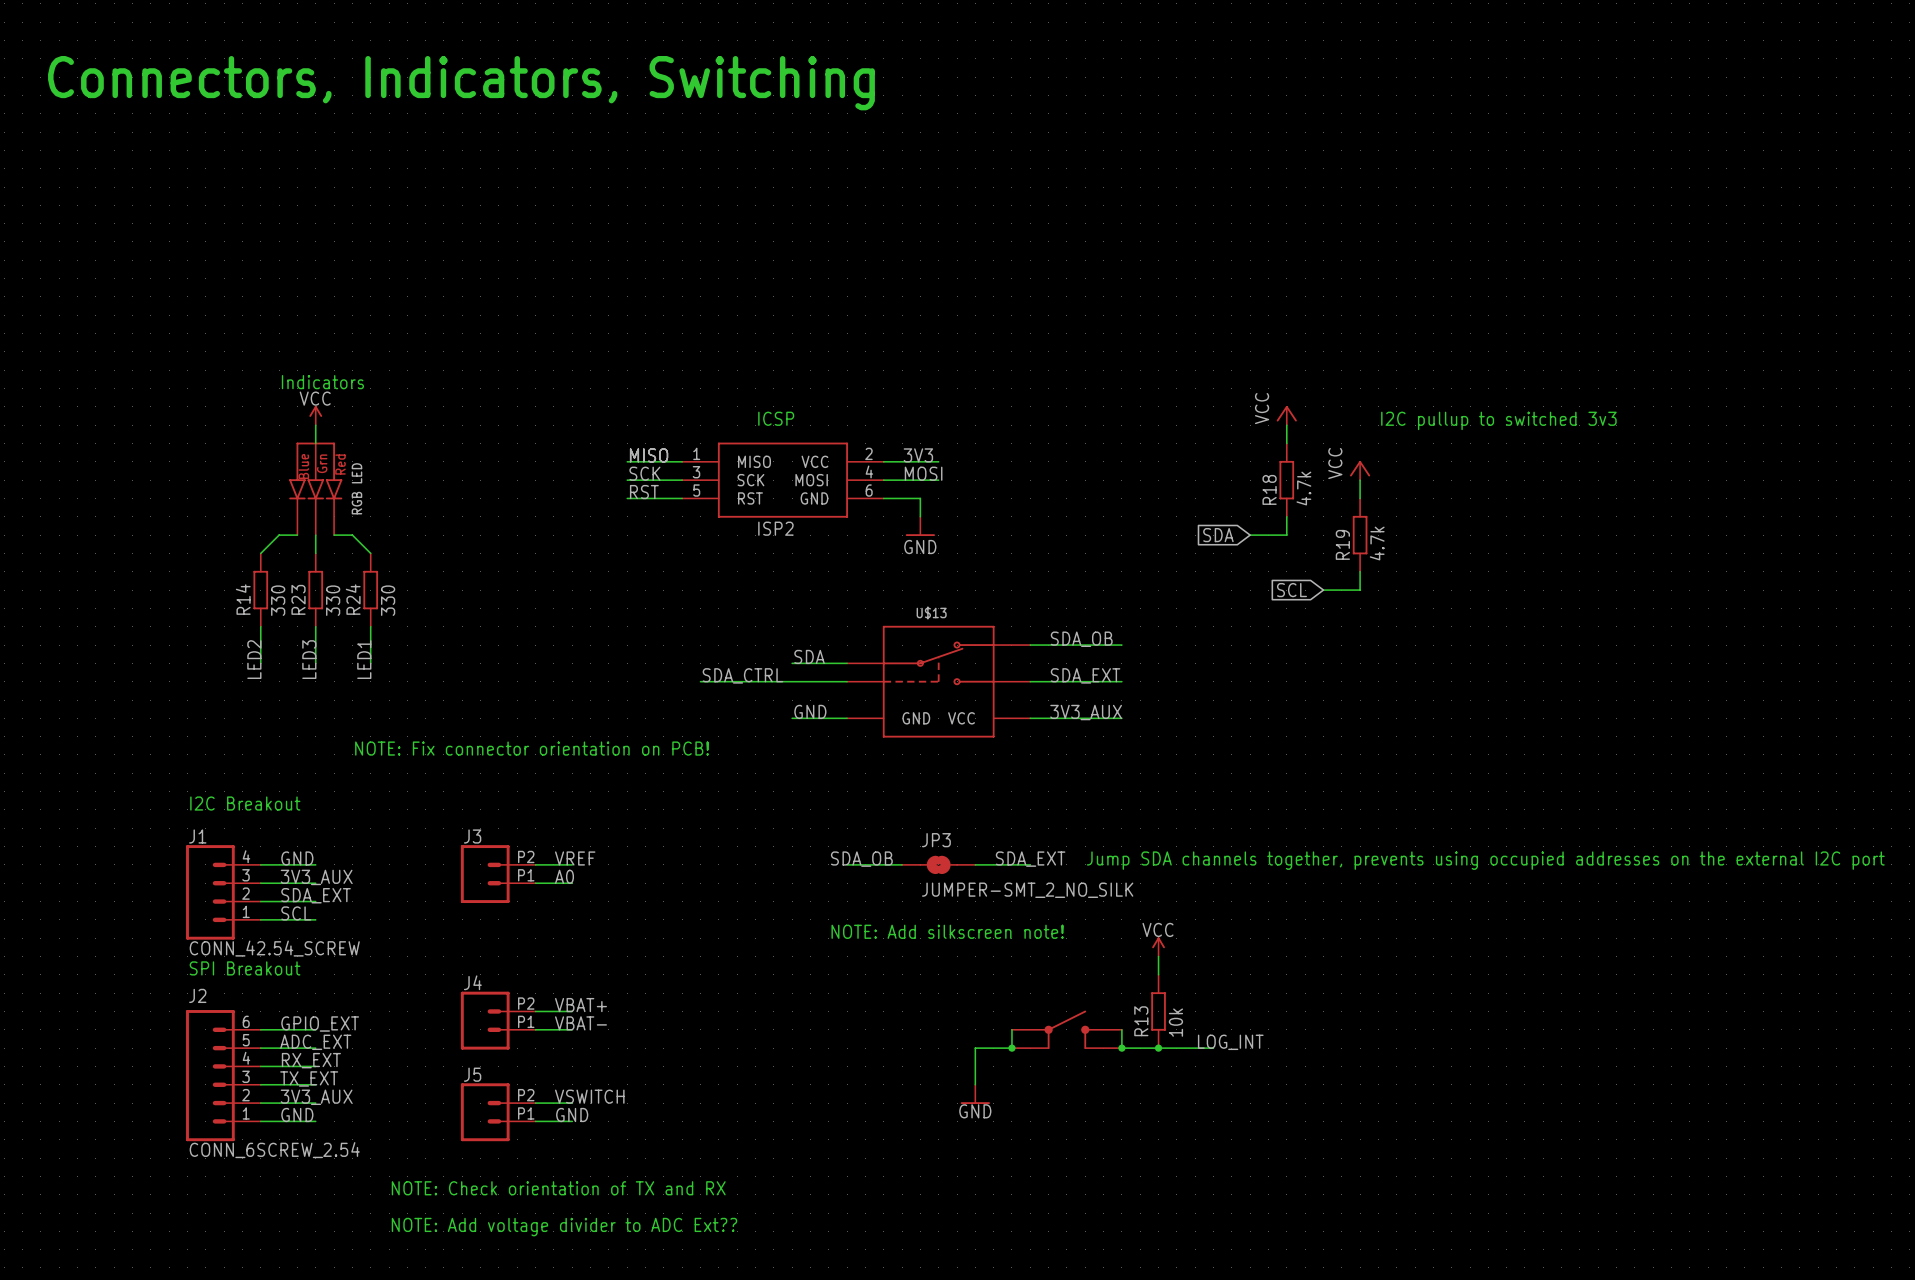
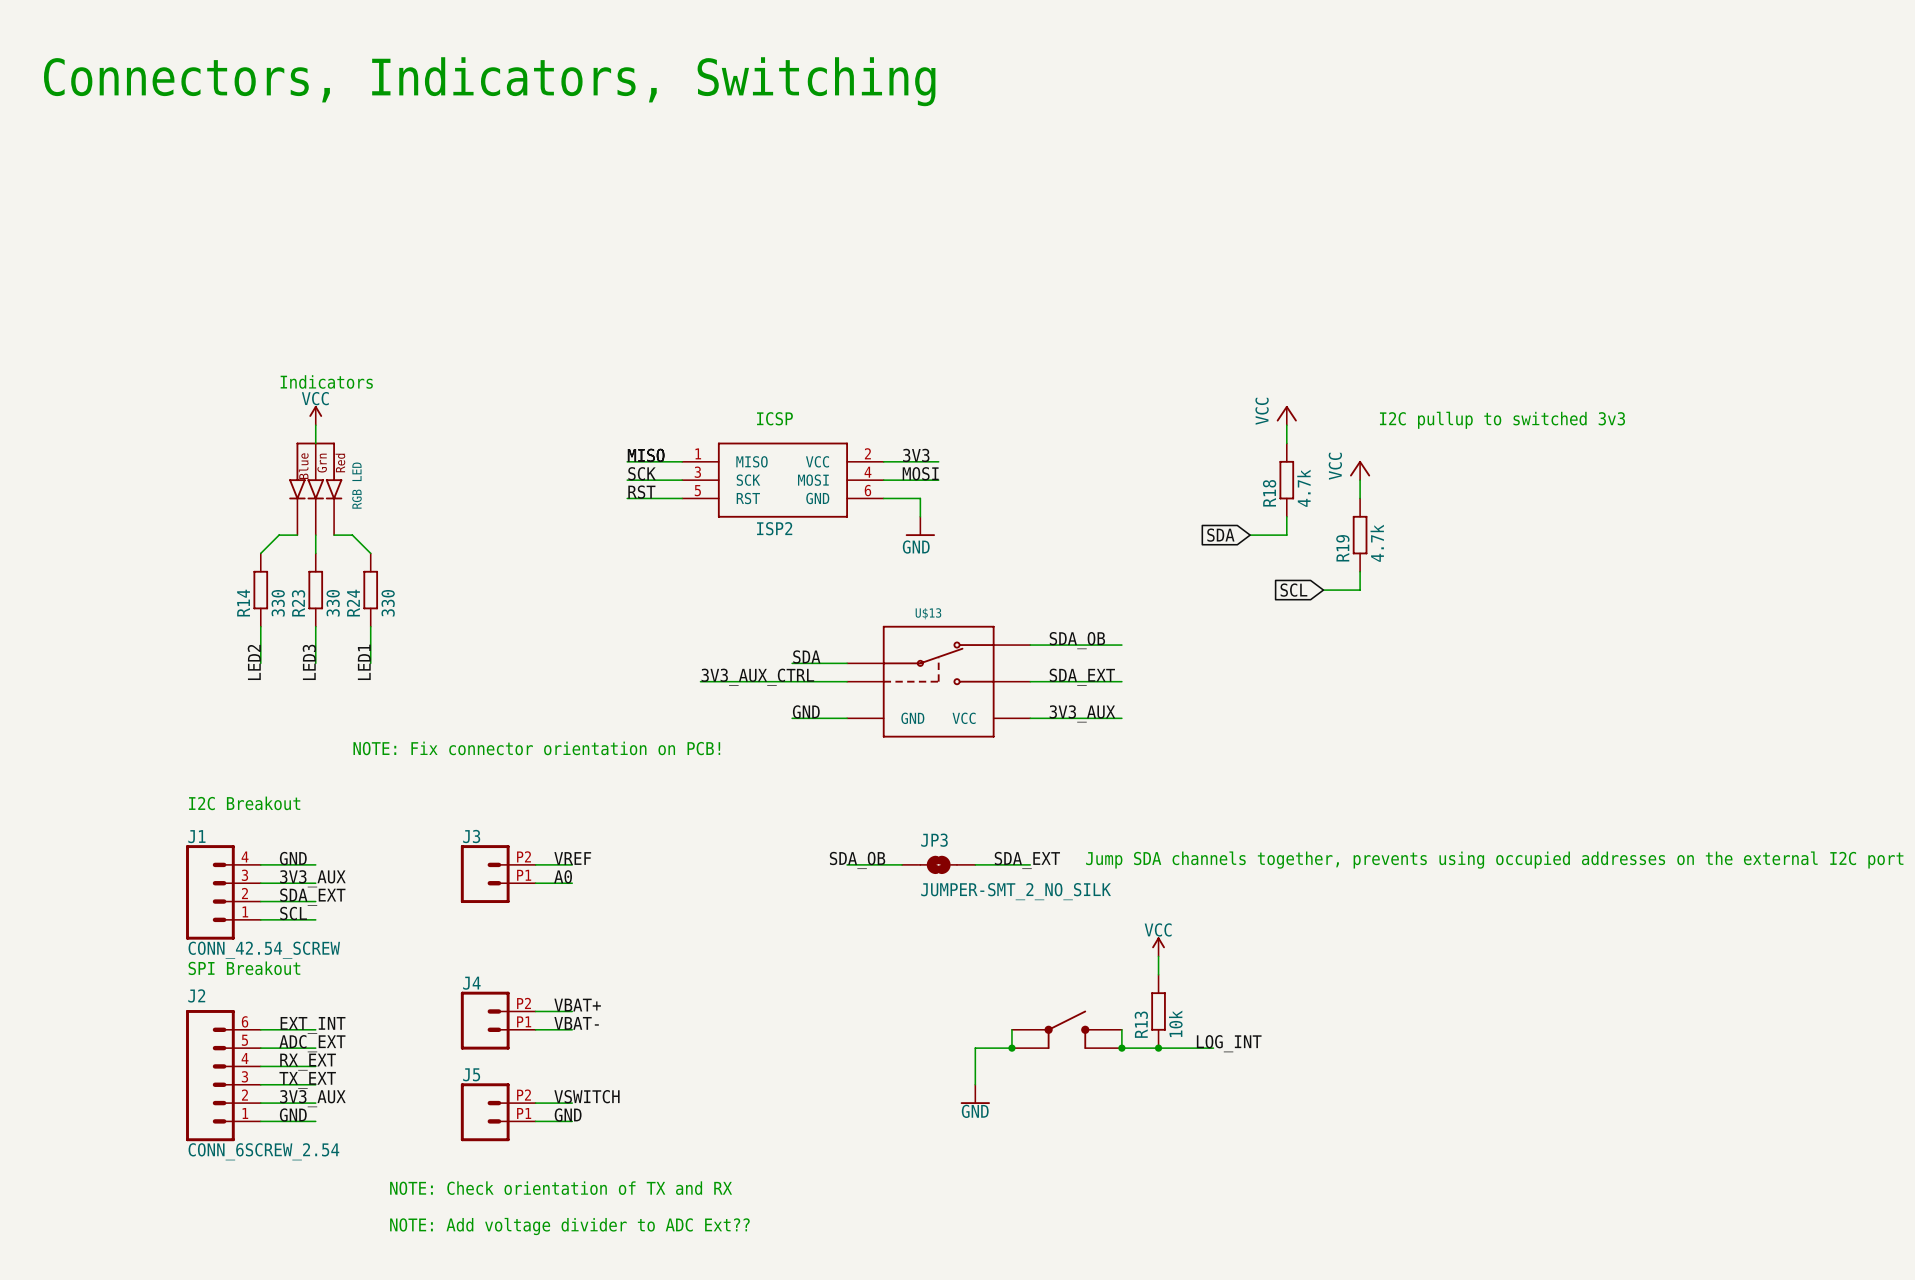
label: SDA_CTRL (742, 675) -> 3V3_AUX_CTRL (757, 677)
text: NOTE: Add silkscreen note! (947, 931) -> none
label: GPIO_EXT (320, 1023) -> EXT_INT (313, 1025)

